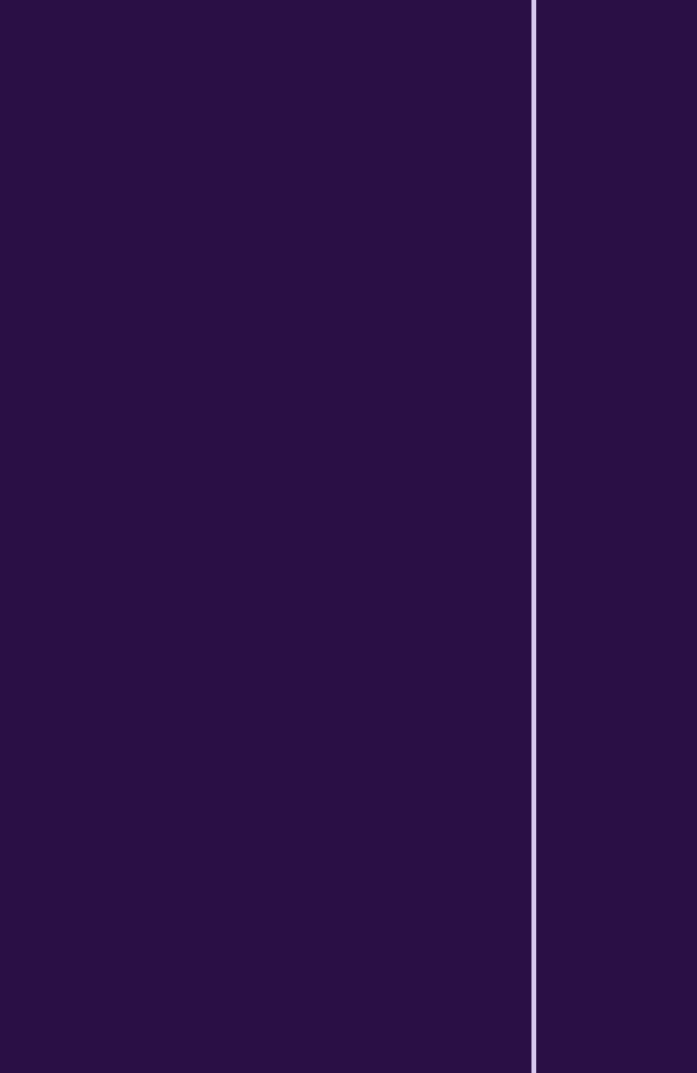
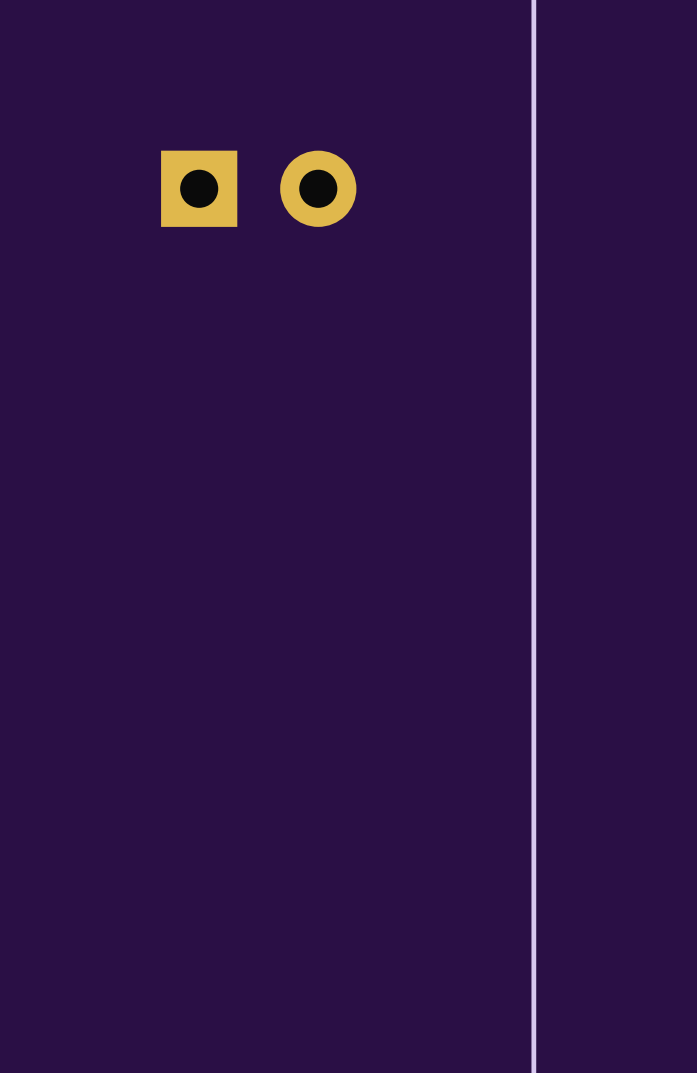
part: none -> (258, 188)

